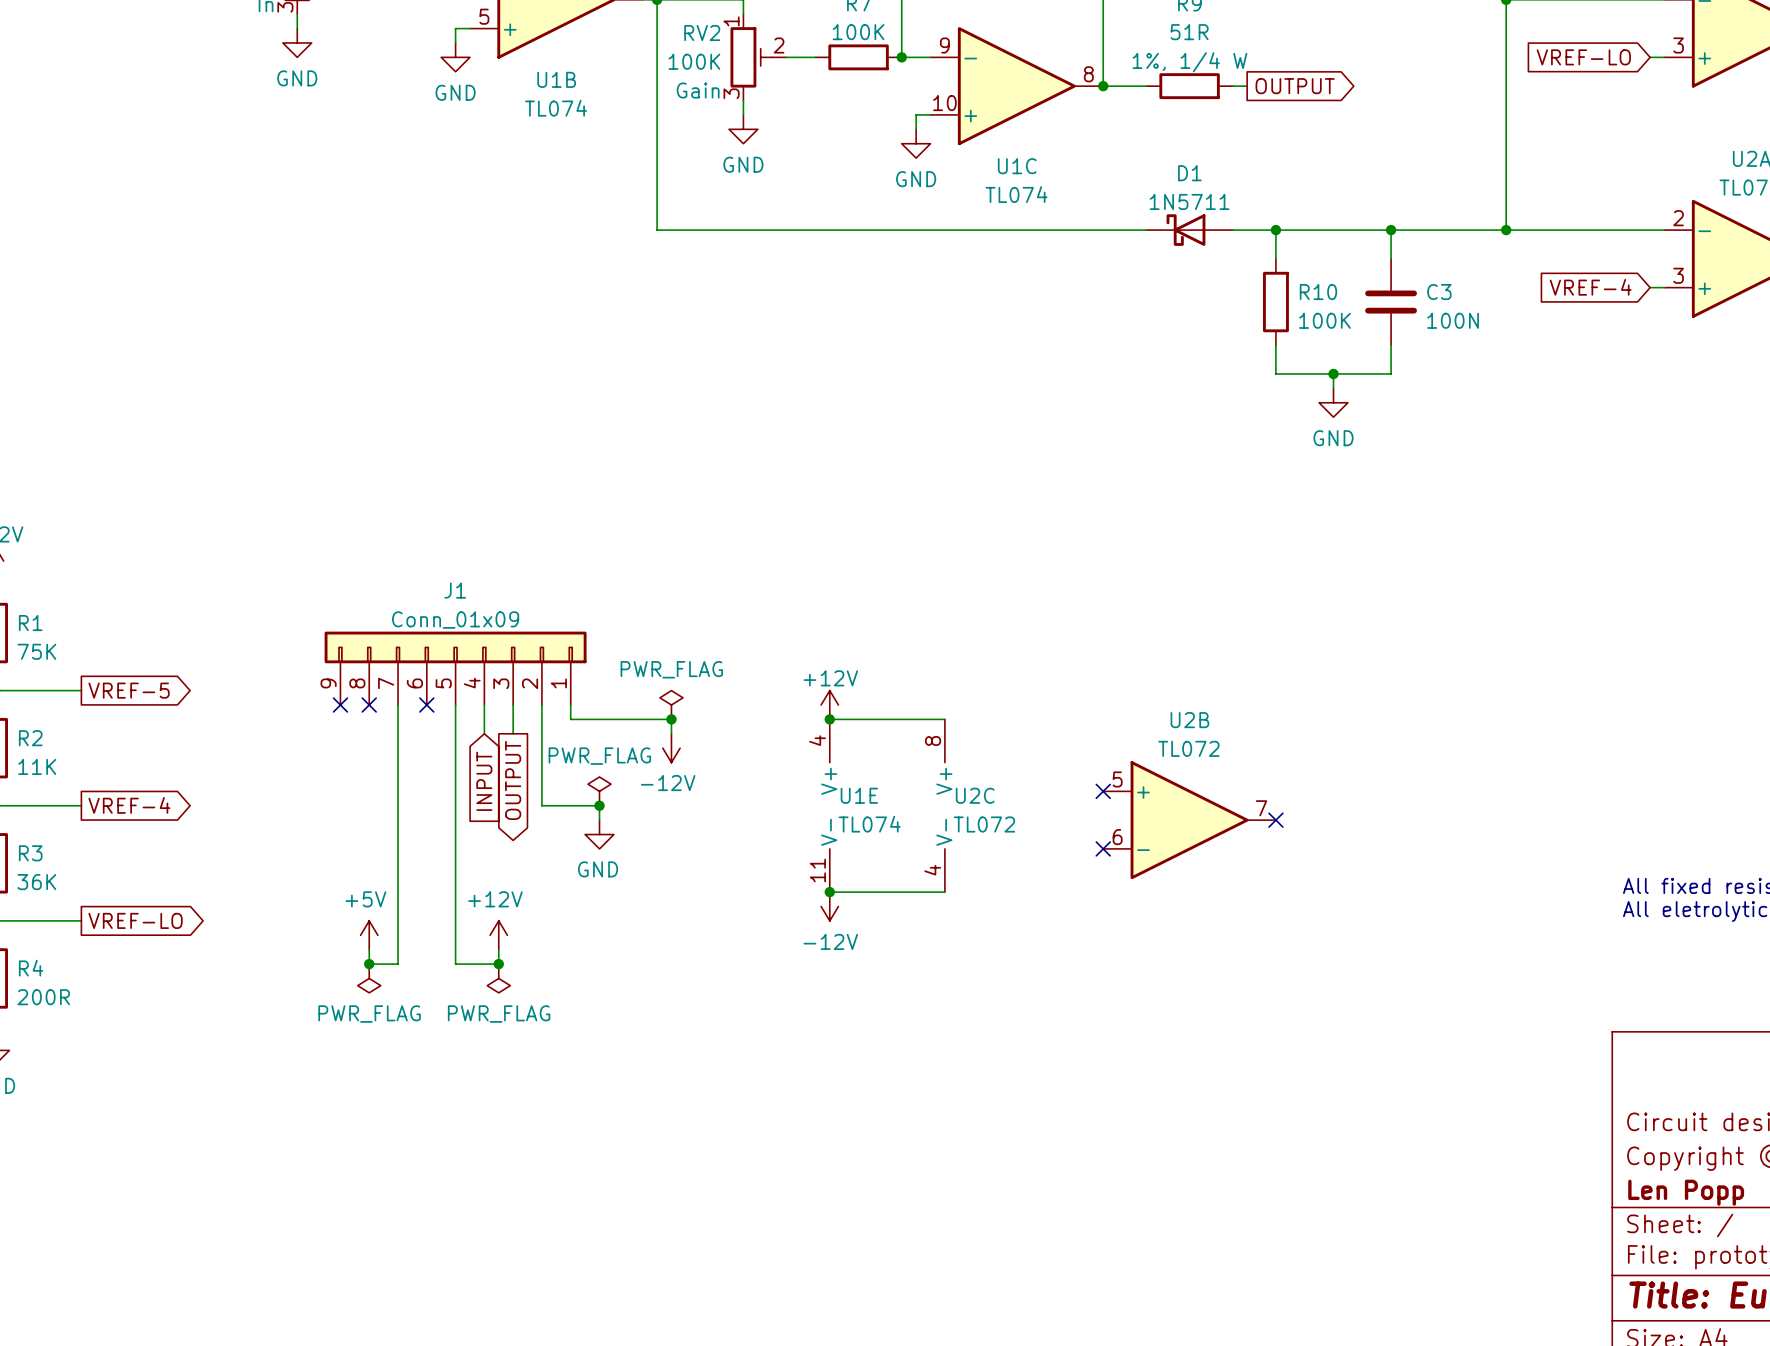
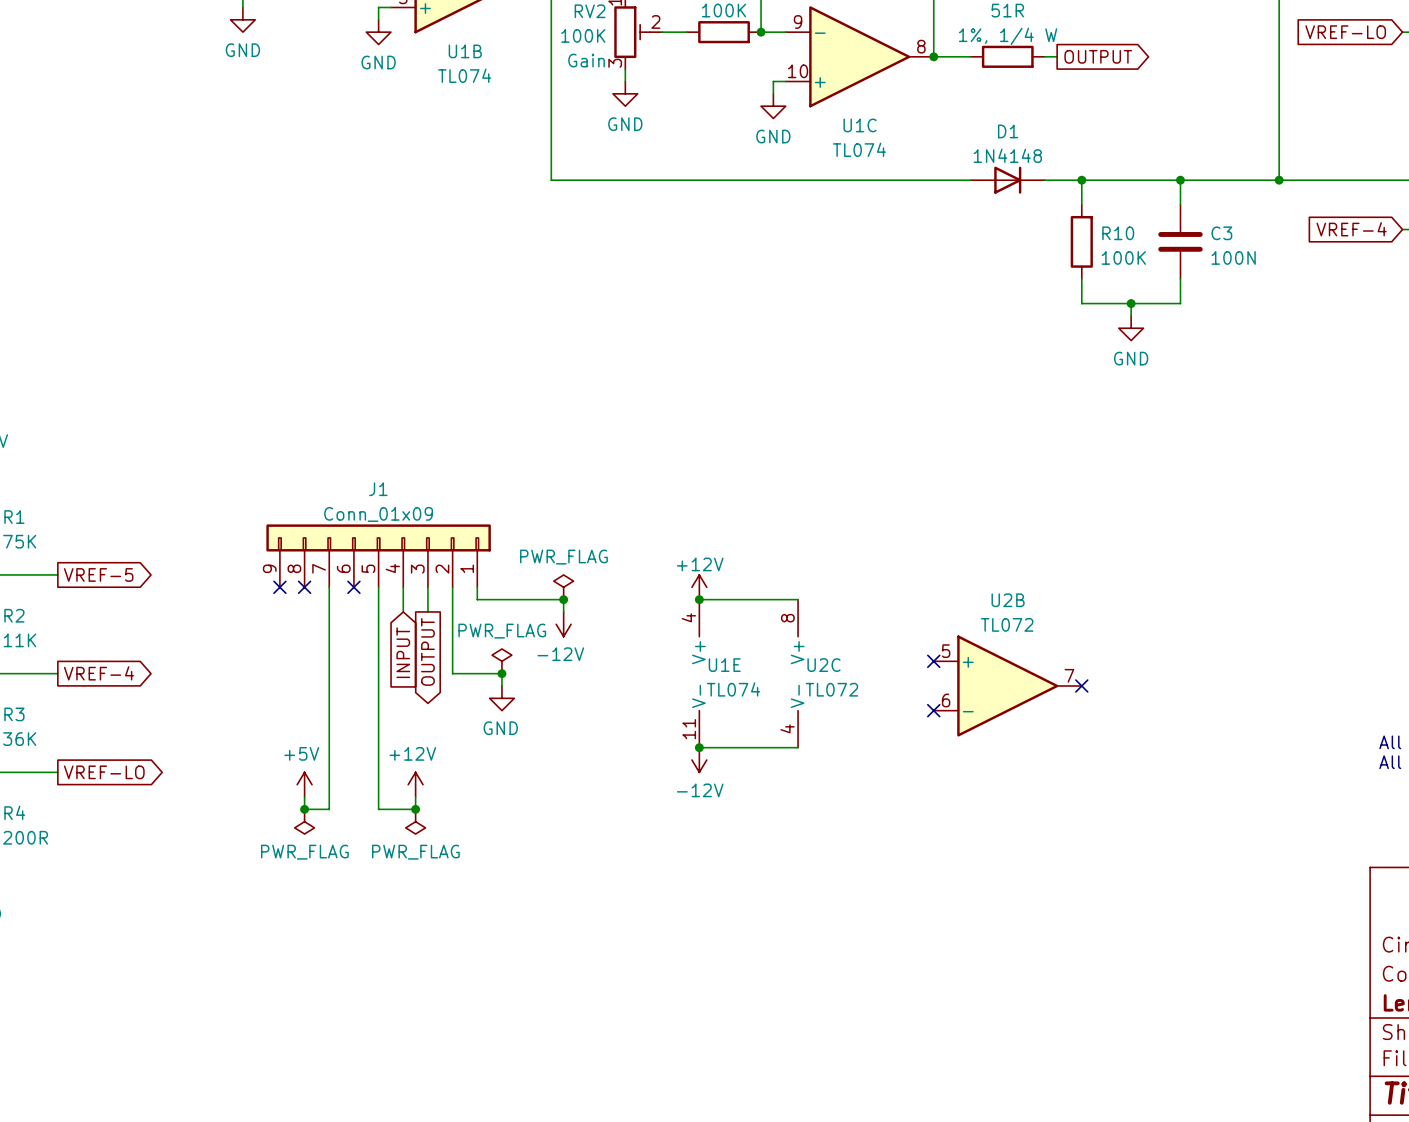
D1 value: 1N5711 (1189, 201) -> 1N4148 (1007, 155)
D1 symbol: [1146, 214, 1233, 246] -> [970, 166, 1045, 194]

